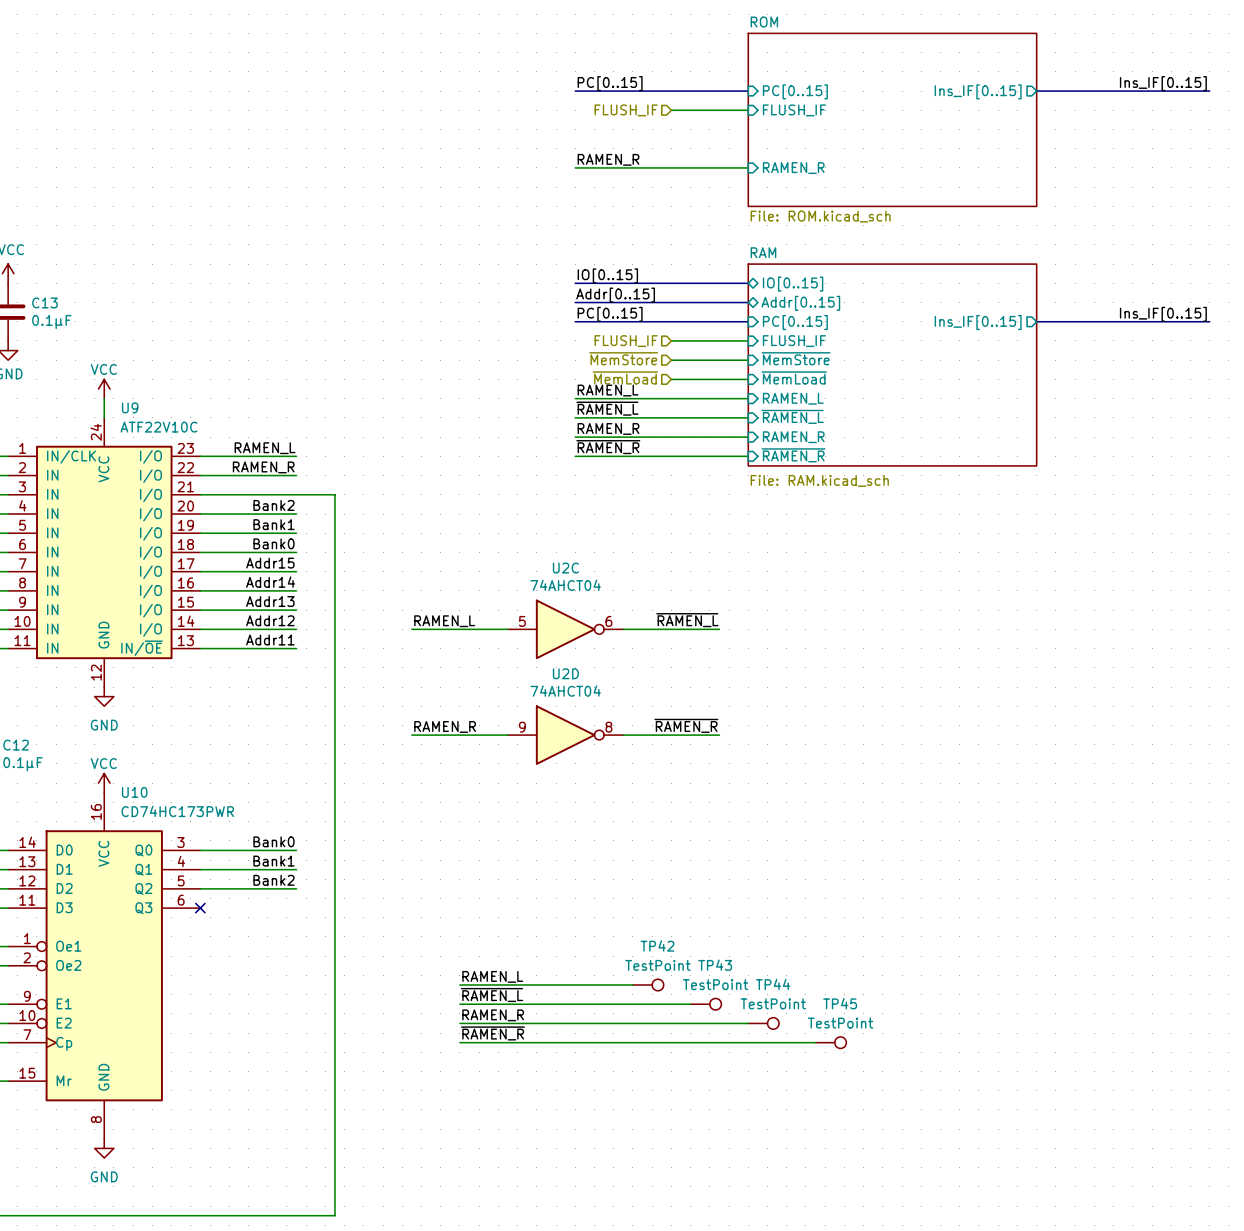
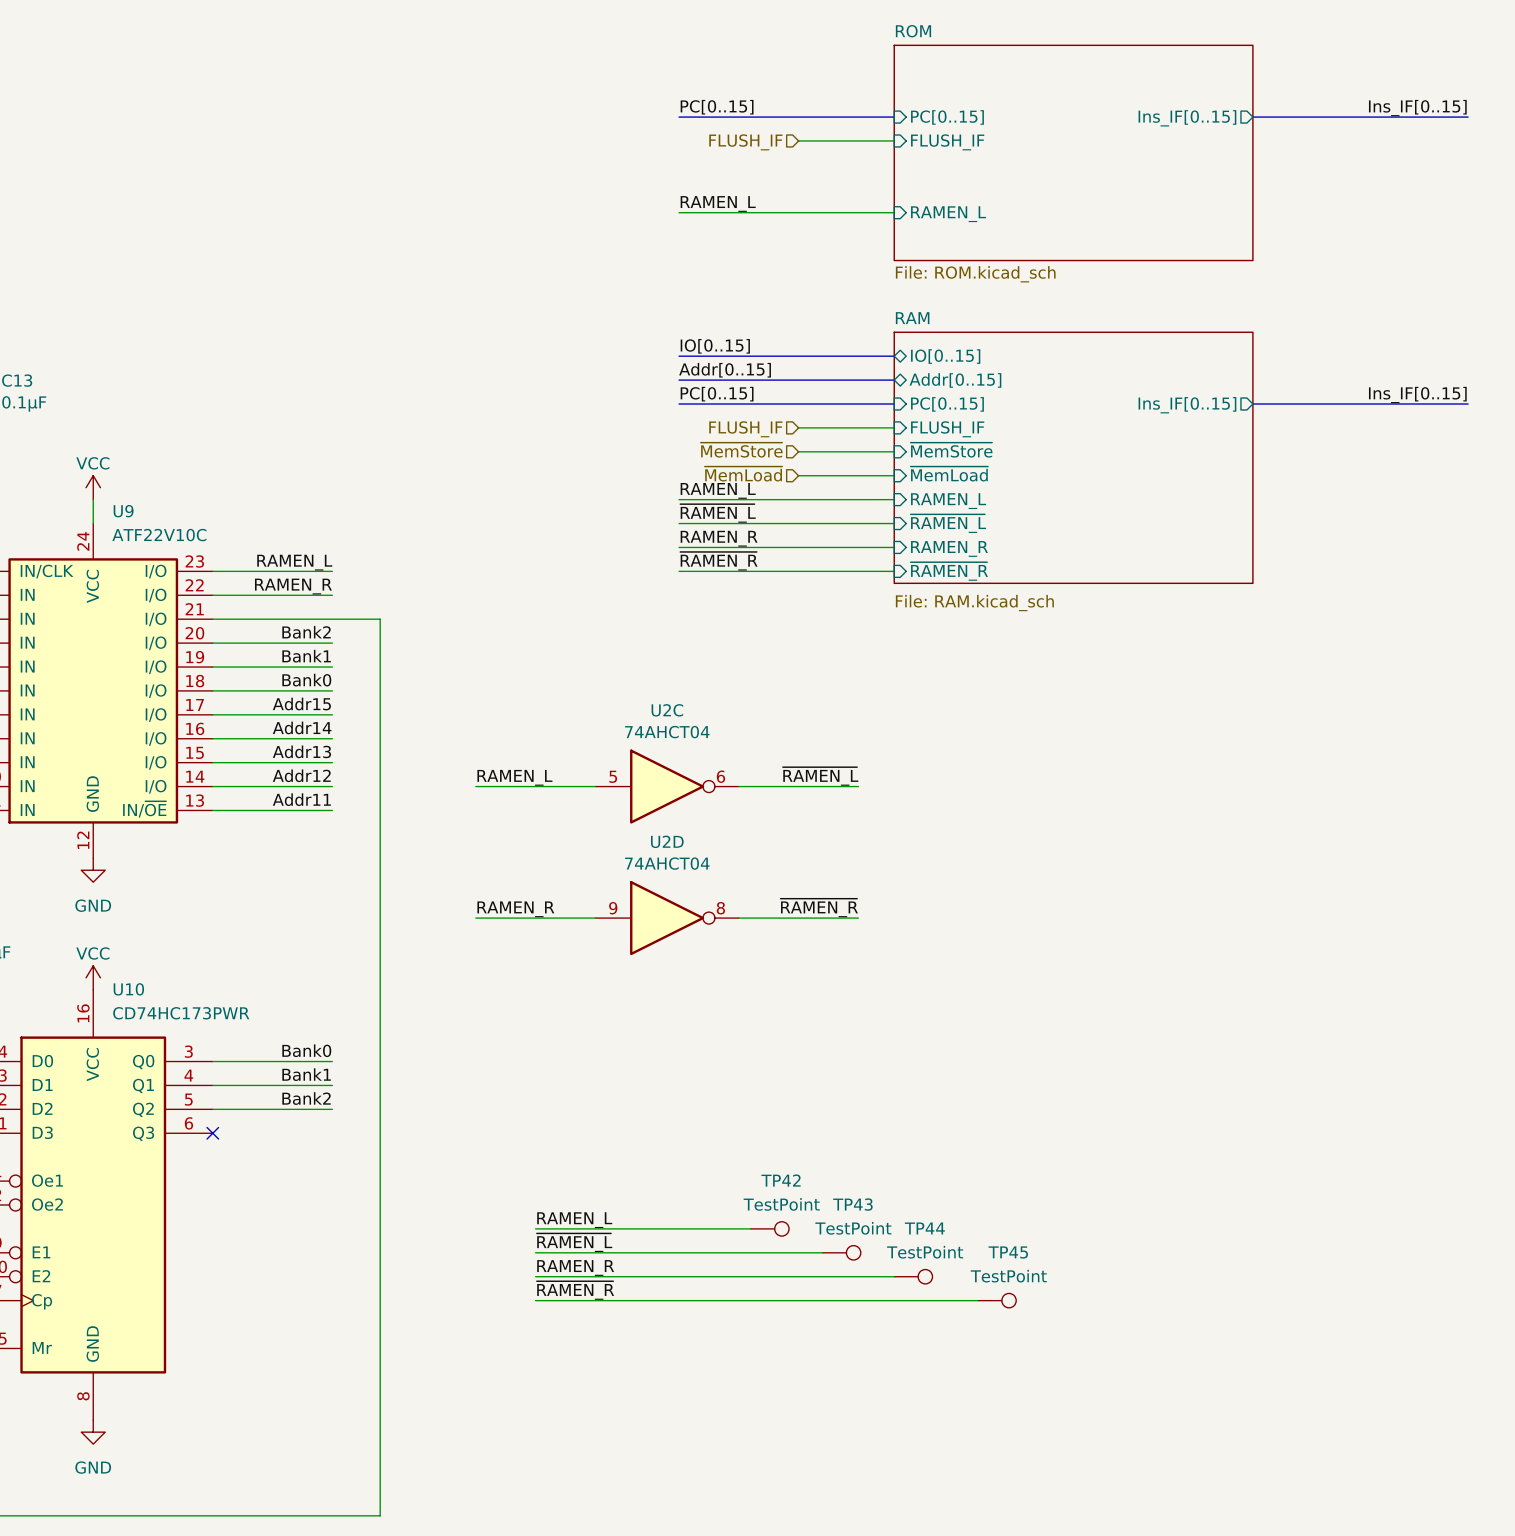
label: RAMEN_R (608, 159) -> RAMEN_L (718, 203)
sheet pin: RAMEN_R (793, 168) -> RAMEN_L (948, 214)

